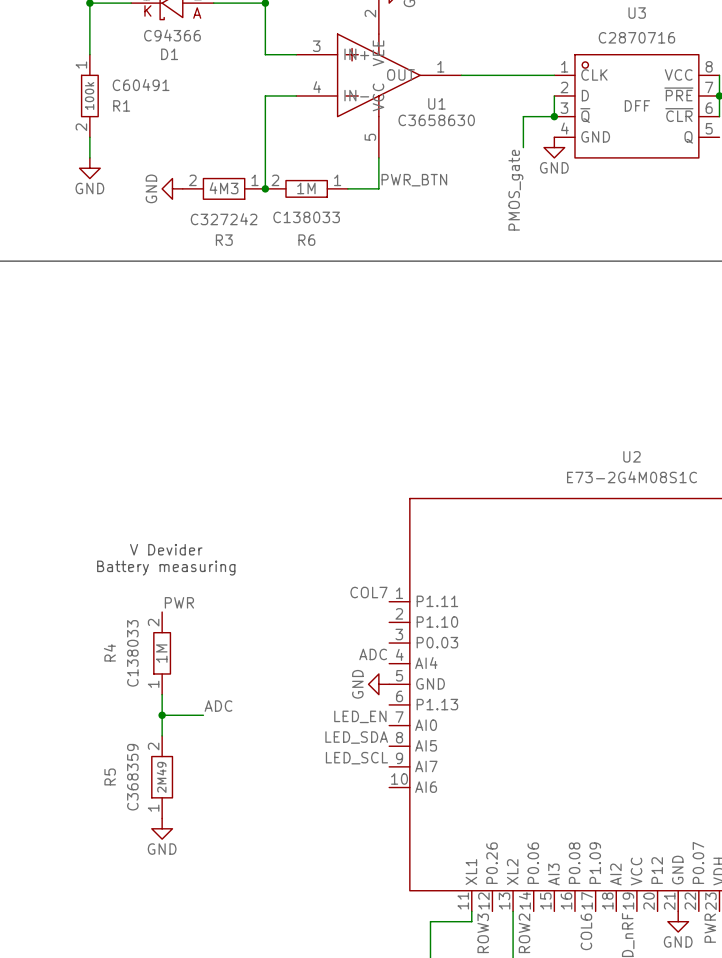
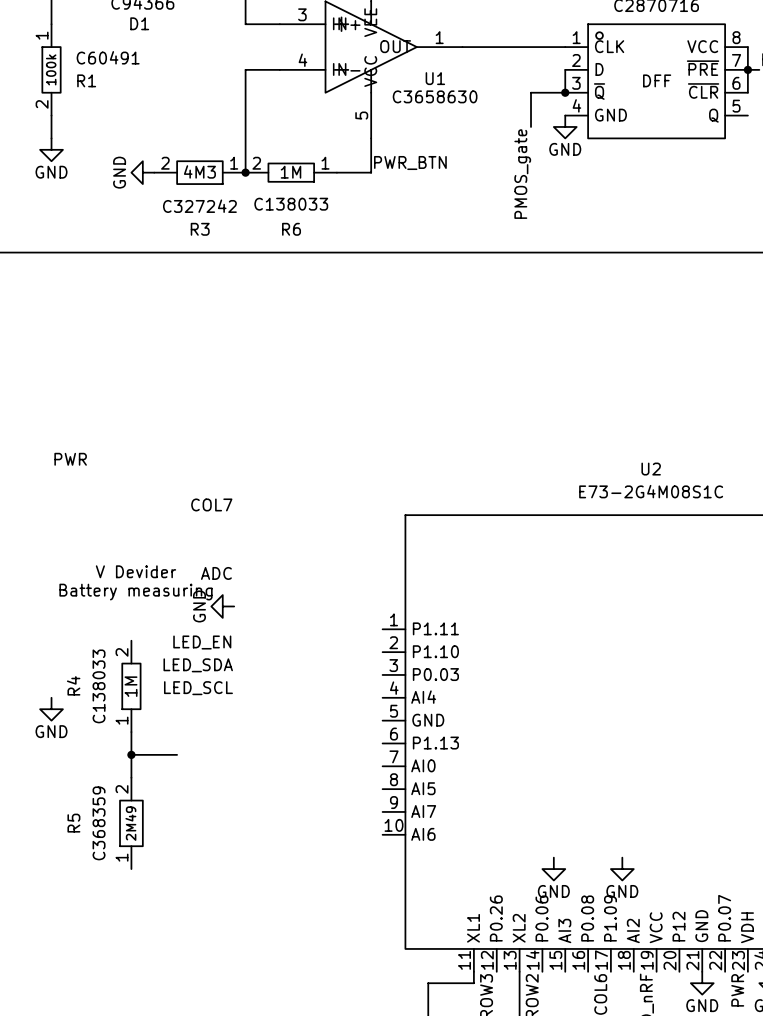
label: none -> ADC (216, 573)
power symbol: none -> GND (222, 606)
label position: COL7 (368, 592) -> COL7 (211, 504)
label position: PWR (179, 602) -> PWR (70, 459)
label: ADC (373, 654) -> none
power symbol: none -> GND (51, 709)
power symbol: GND (378, 684) -> none
label: ADC (218, 706) -> none
label position: LED_EN (360, 716) -> LED_EN (202, 642)
label position: LED_SDA (356, 737) -> LED_SDA (198, 665)
label position: LED_SCL (356, 758) -> LED_SCL (198, 688)
power symbol: none -> GND (553, 869)
power symbol: none -> GND (622, 869)
power symbol: GND (162, 828) -> none

